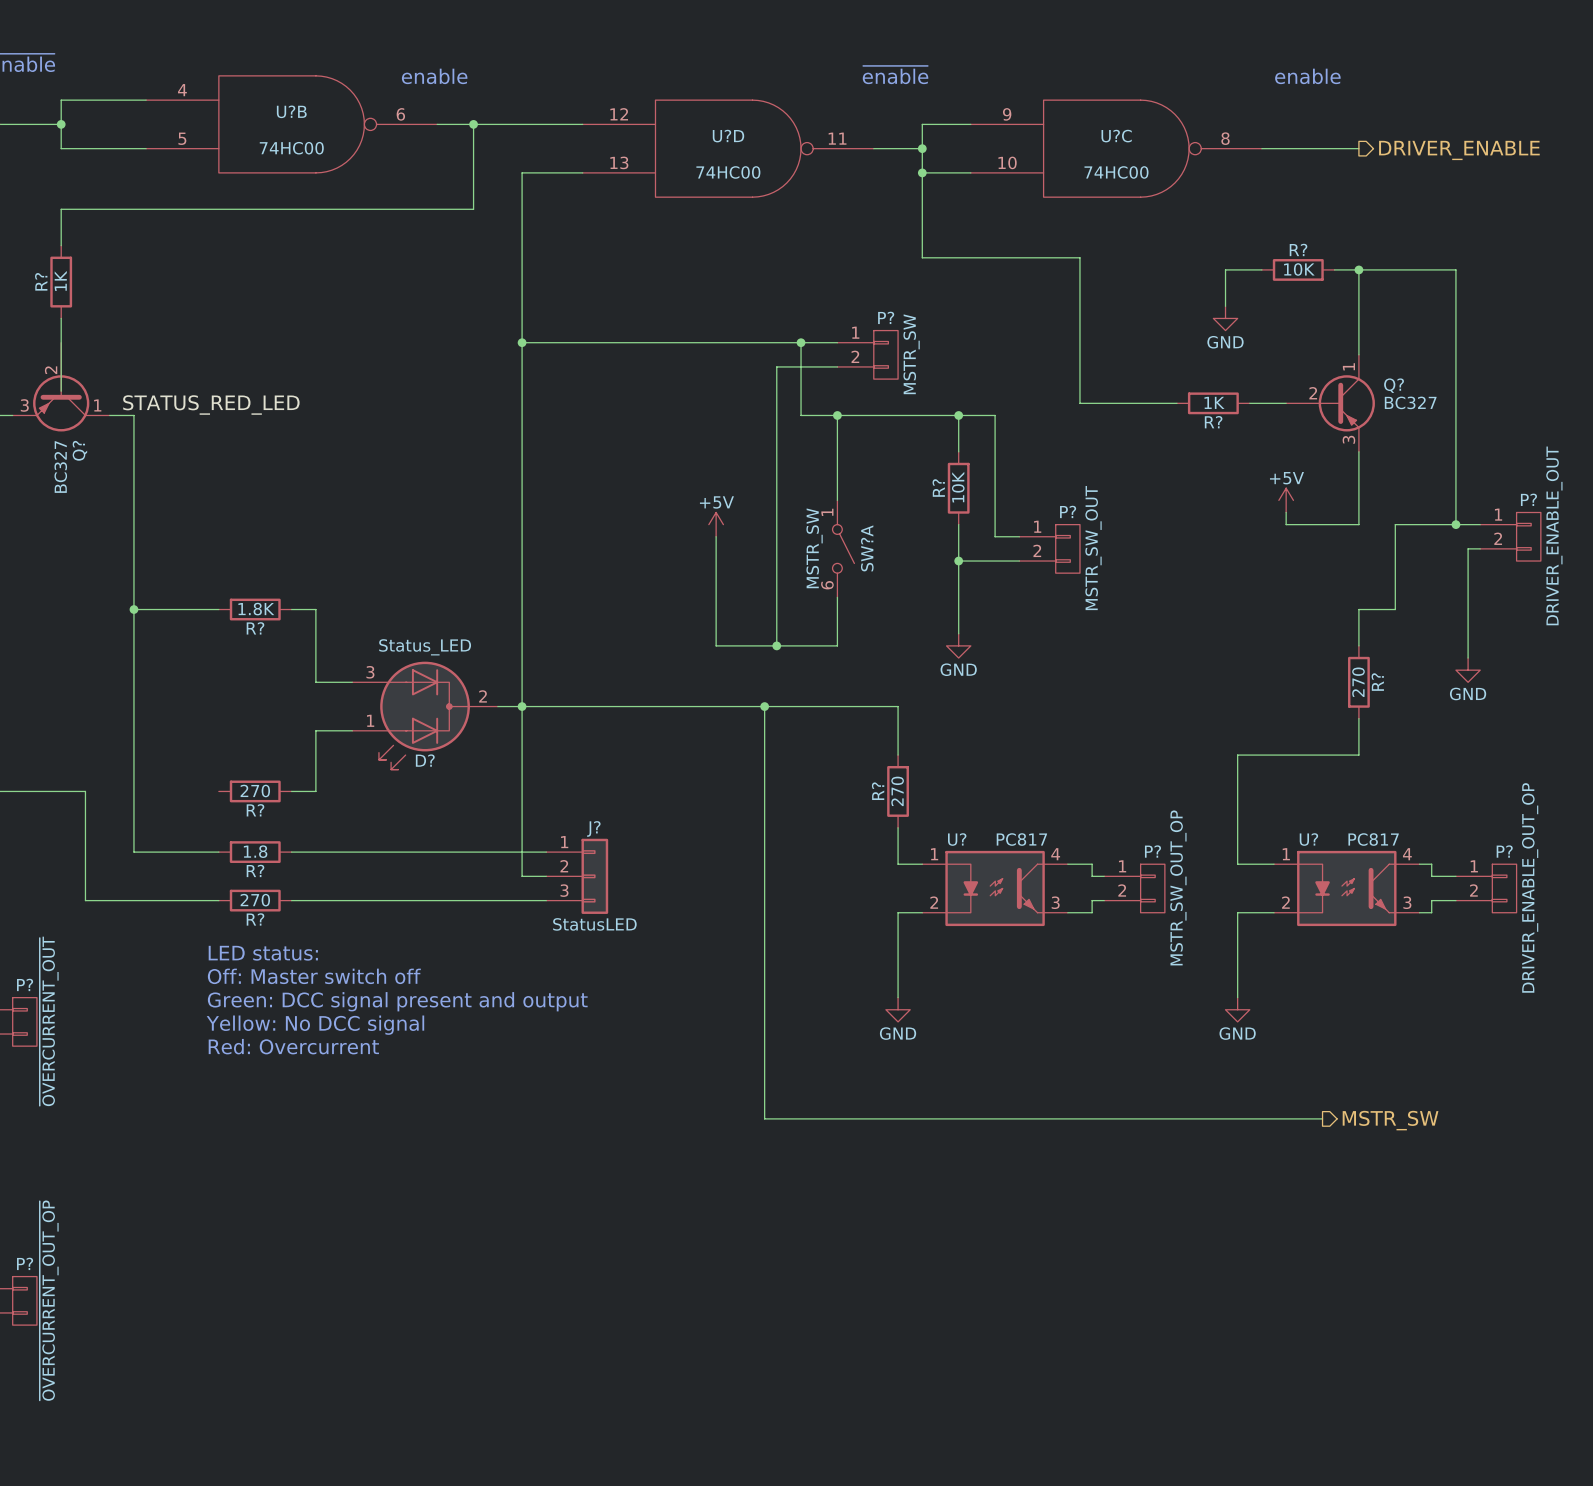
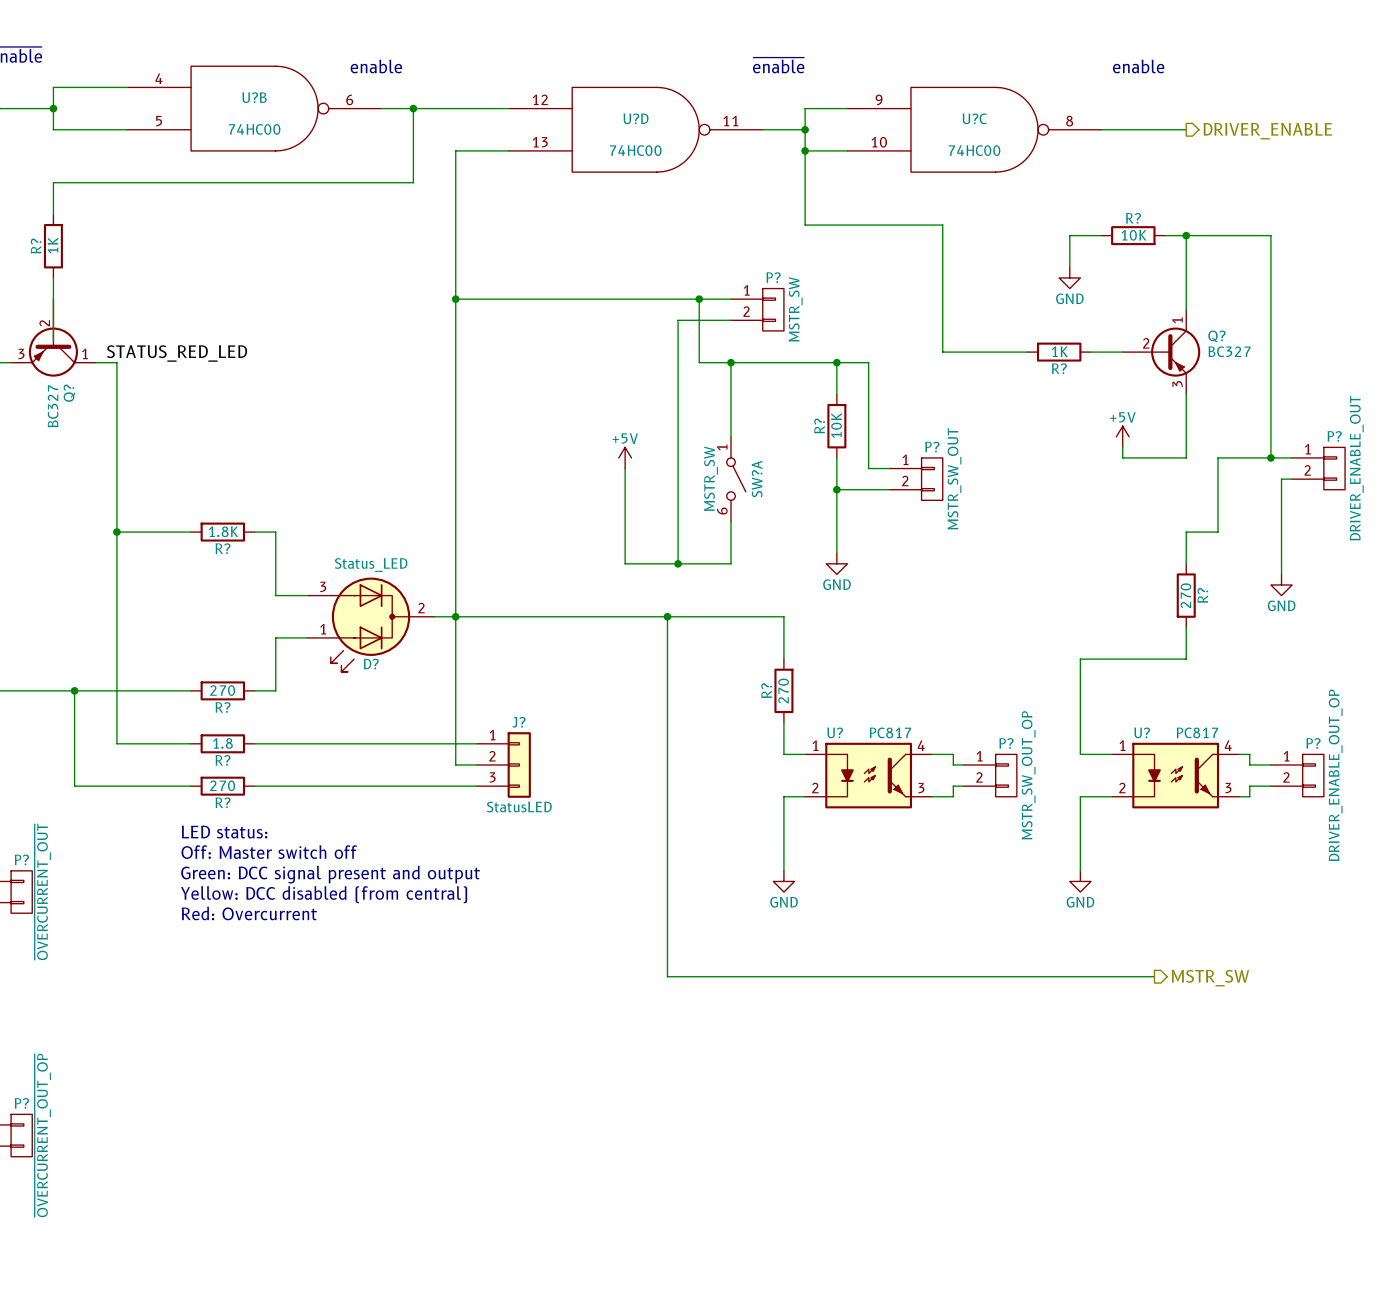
wire: none -> (74, 690) (191, 690)
junction: none -> (74, 690)
text: Yellow: No DCC signal (315, 1025) -> Yellow: DCC disabled (from central) (324, 894)

